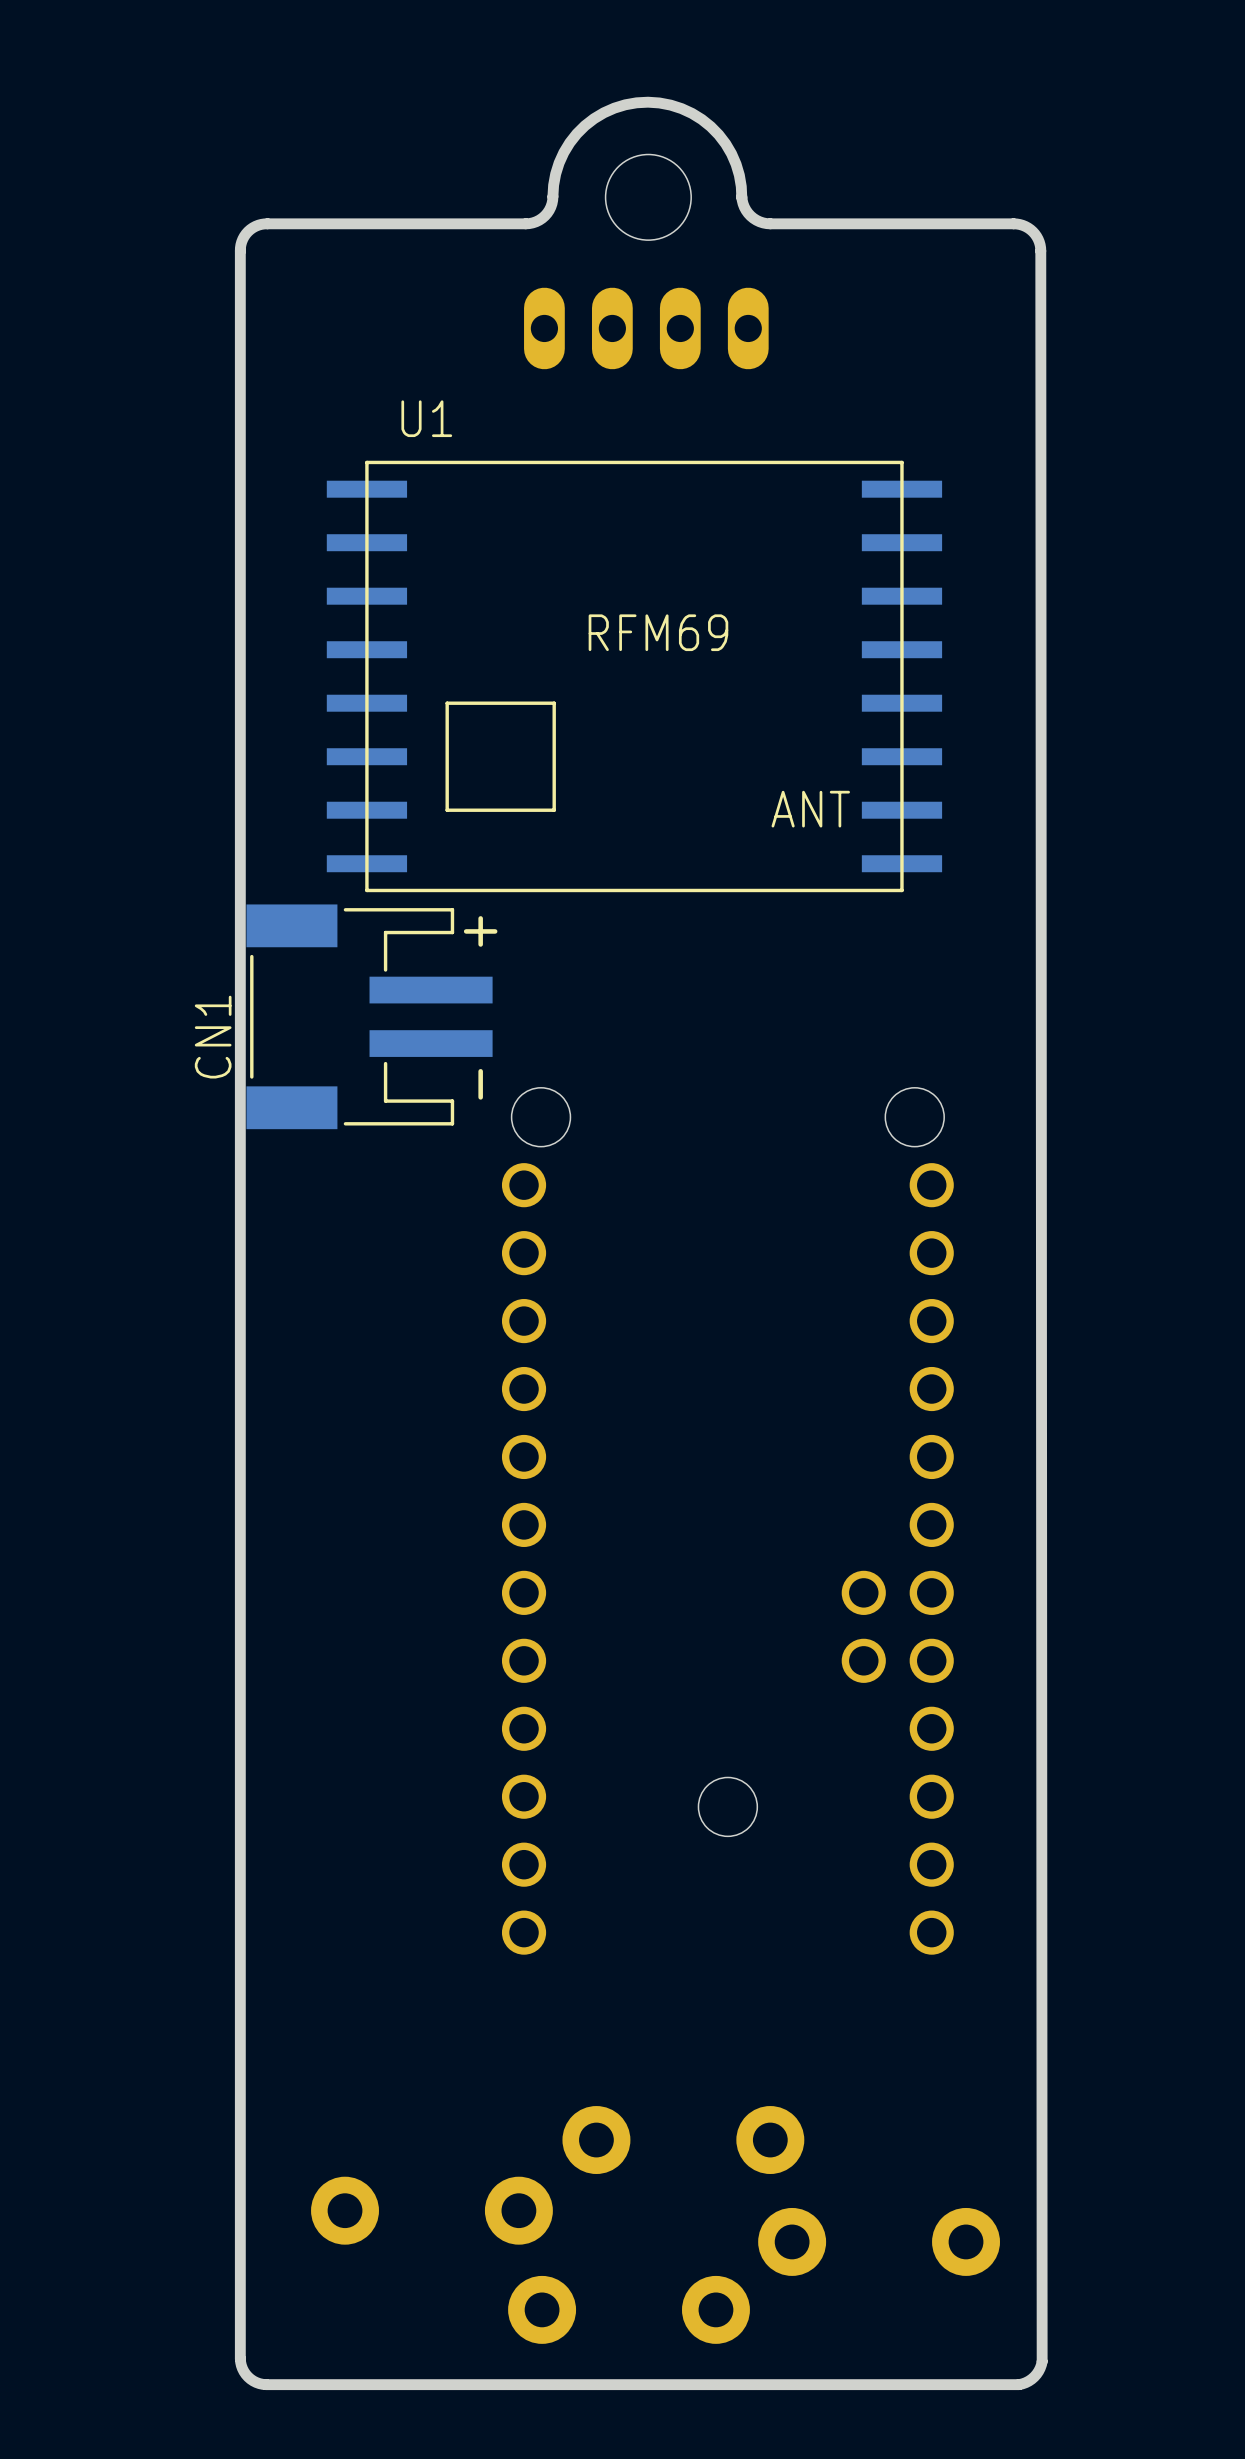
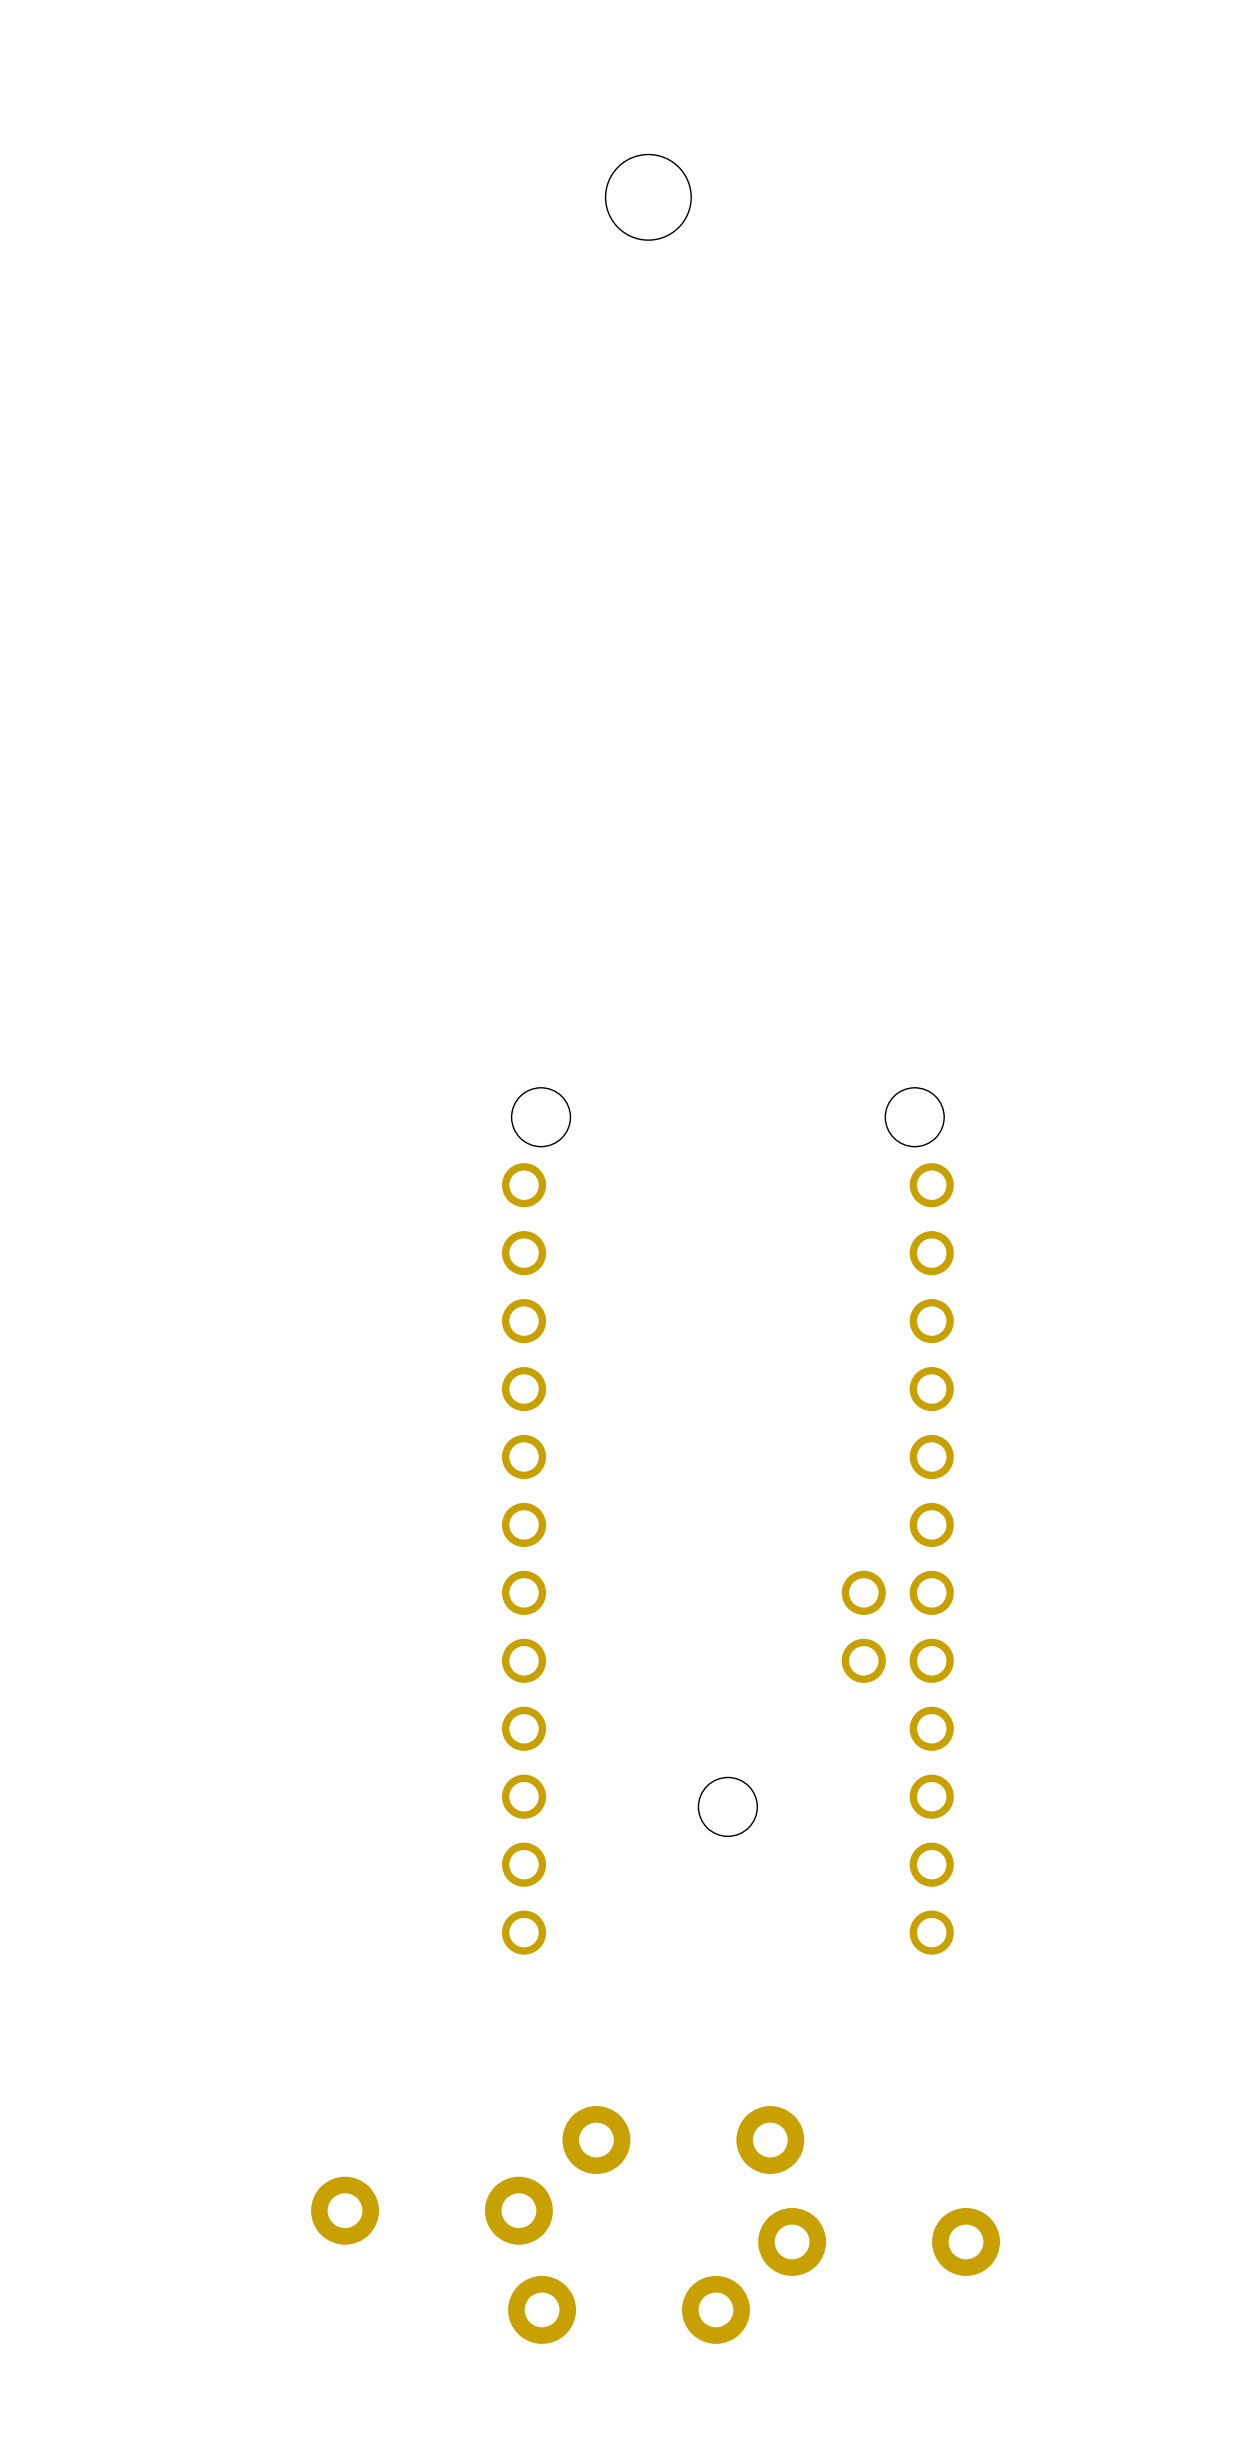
board edge: (741, 196) (744, 207) (750, 215) (766, 223) (1016, 223) (1025, 226) (1032, 231) (1038, 239) (1040, 247) (1042, 2361) (1034, 2376) (1019, 2384) (259, 2383) (245, 2374) (240, 2358) (240, 244) (248, 231) (255, 226) (264, 223) (525, 223) (536, 221) (544, 215) (550, 207) (559, 163) (576, 133) (603, 112) (636, 102) (670, 105) (692, 113) (710, 126) (731, 153) (739, 175) (741, 198) -> none
part: (646, 328) -> none
U1: (634, 676) -> none
CN1: (369, 1016) -> none

